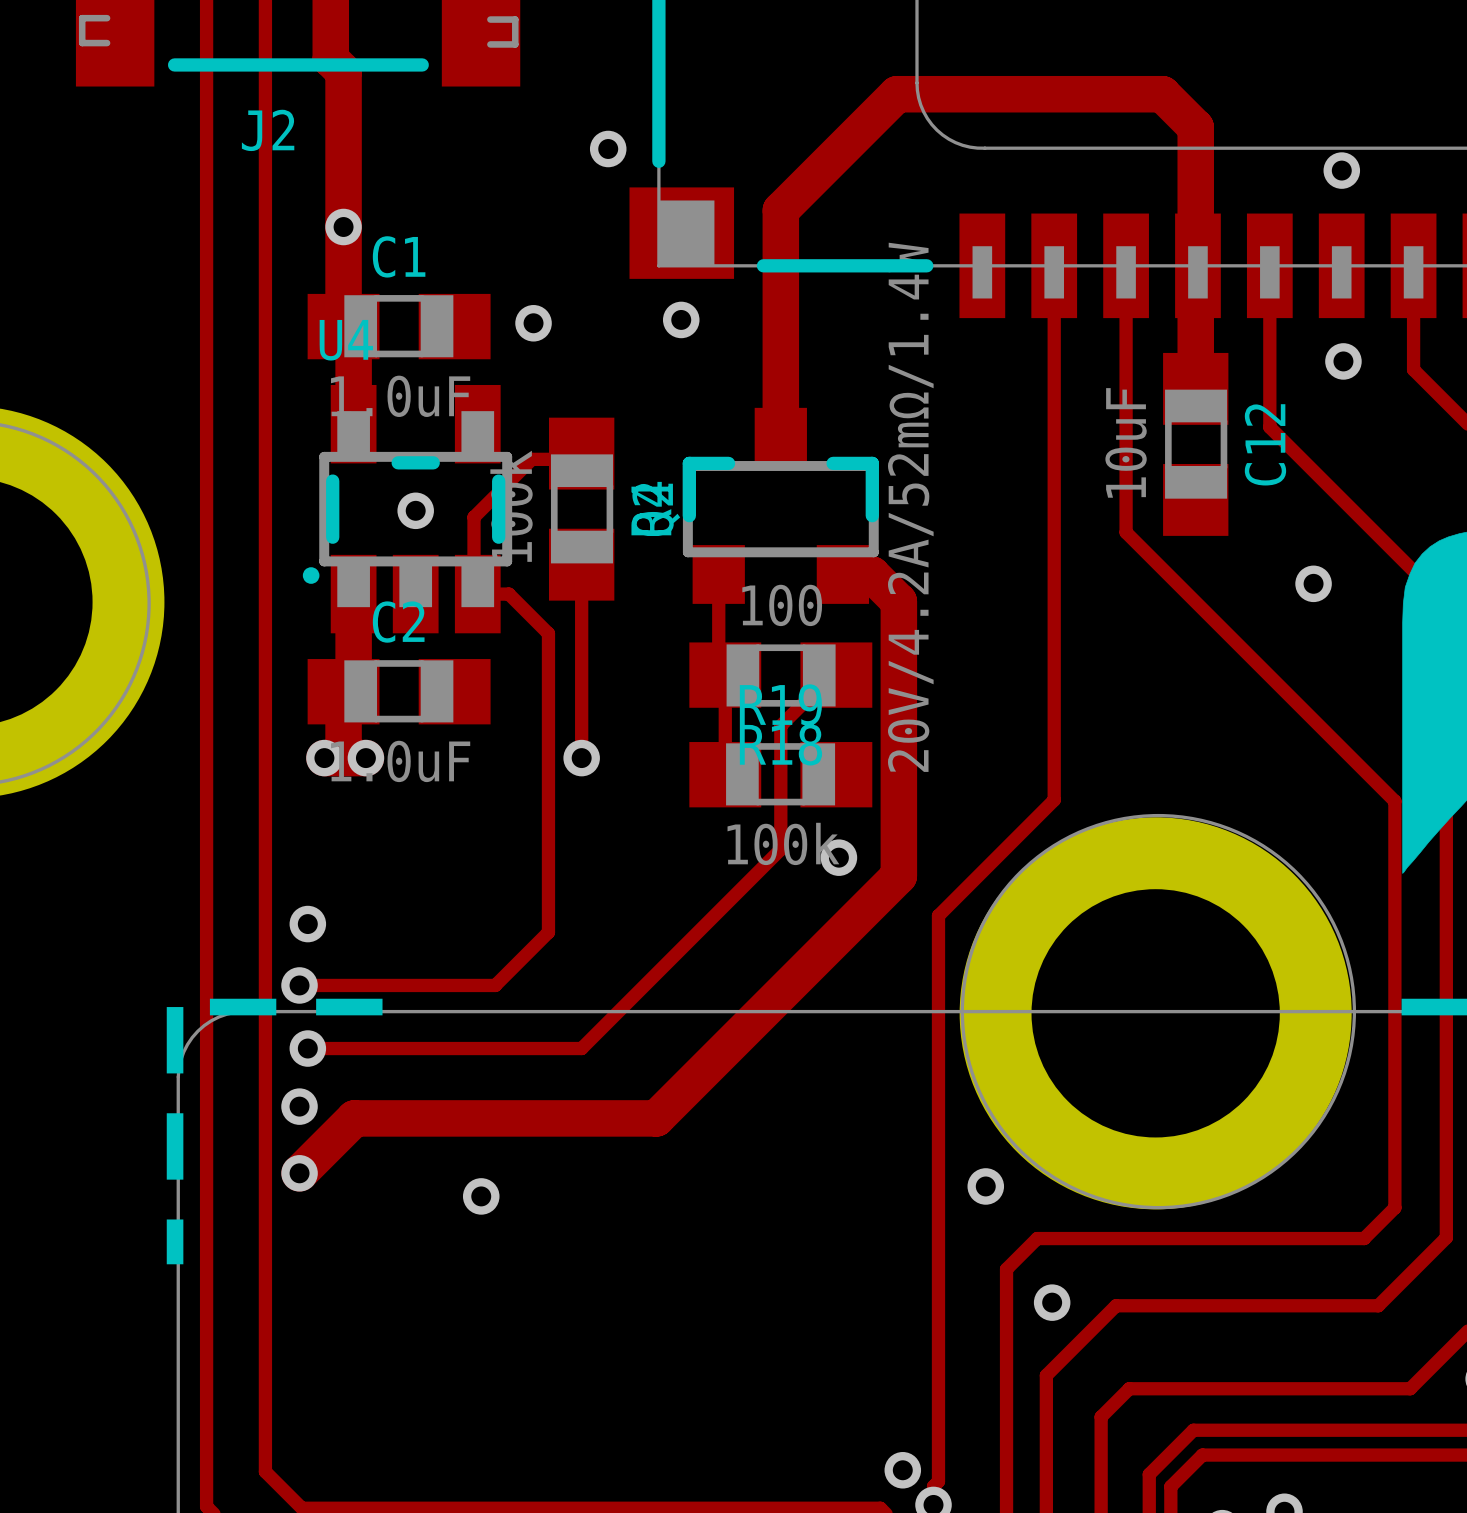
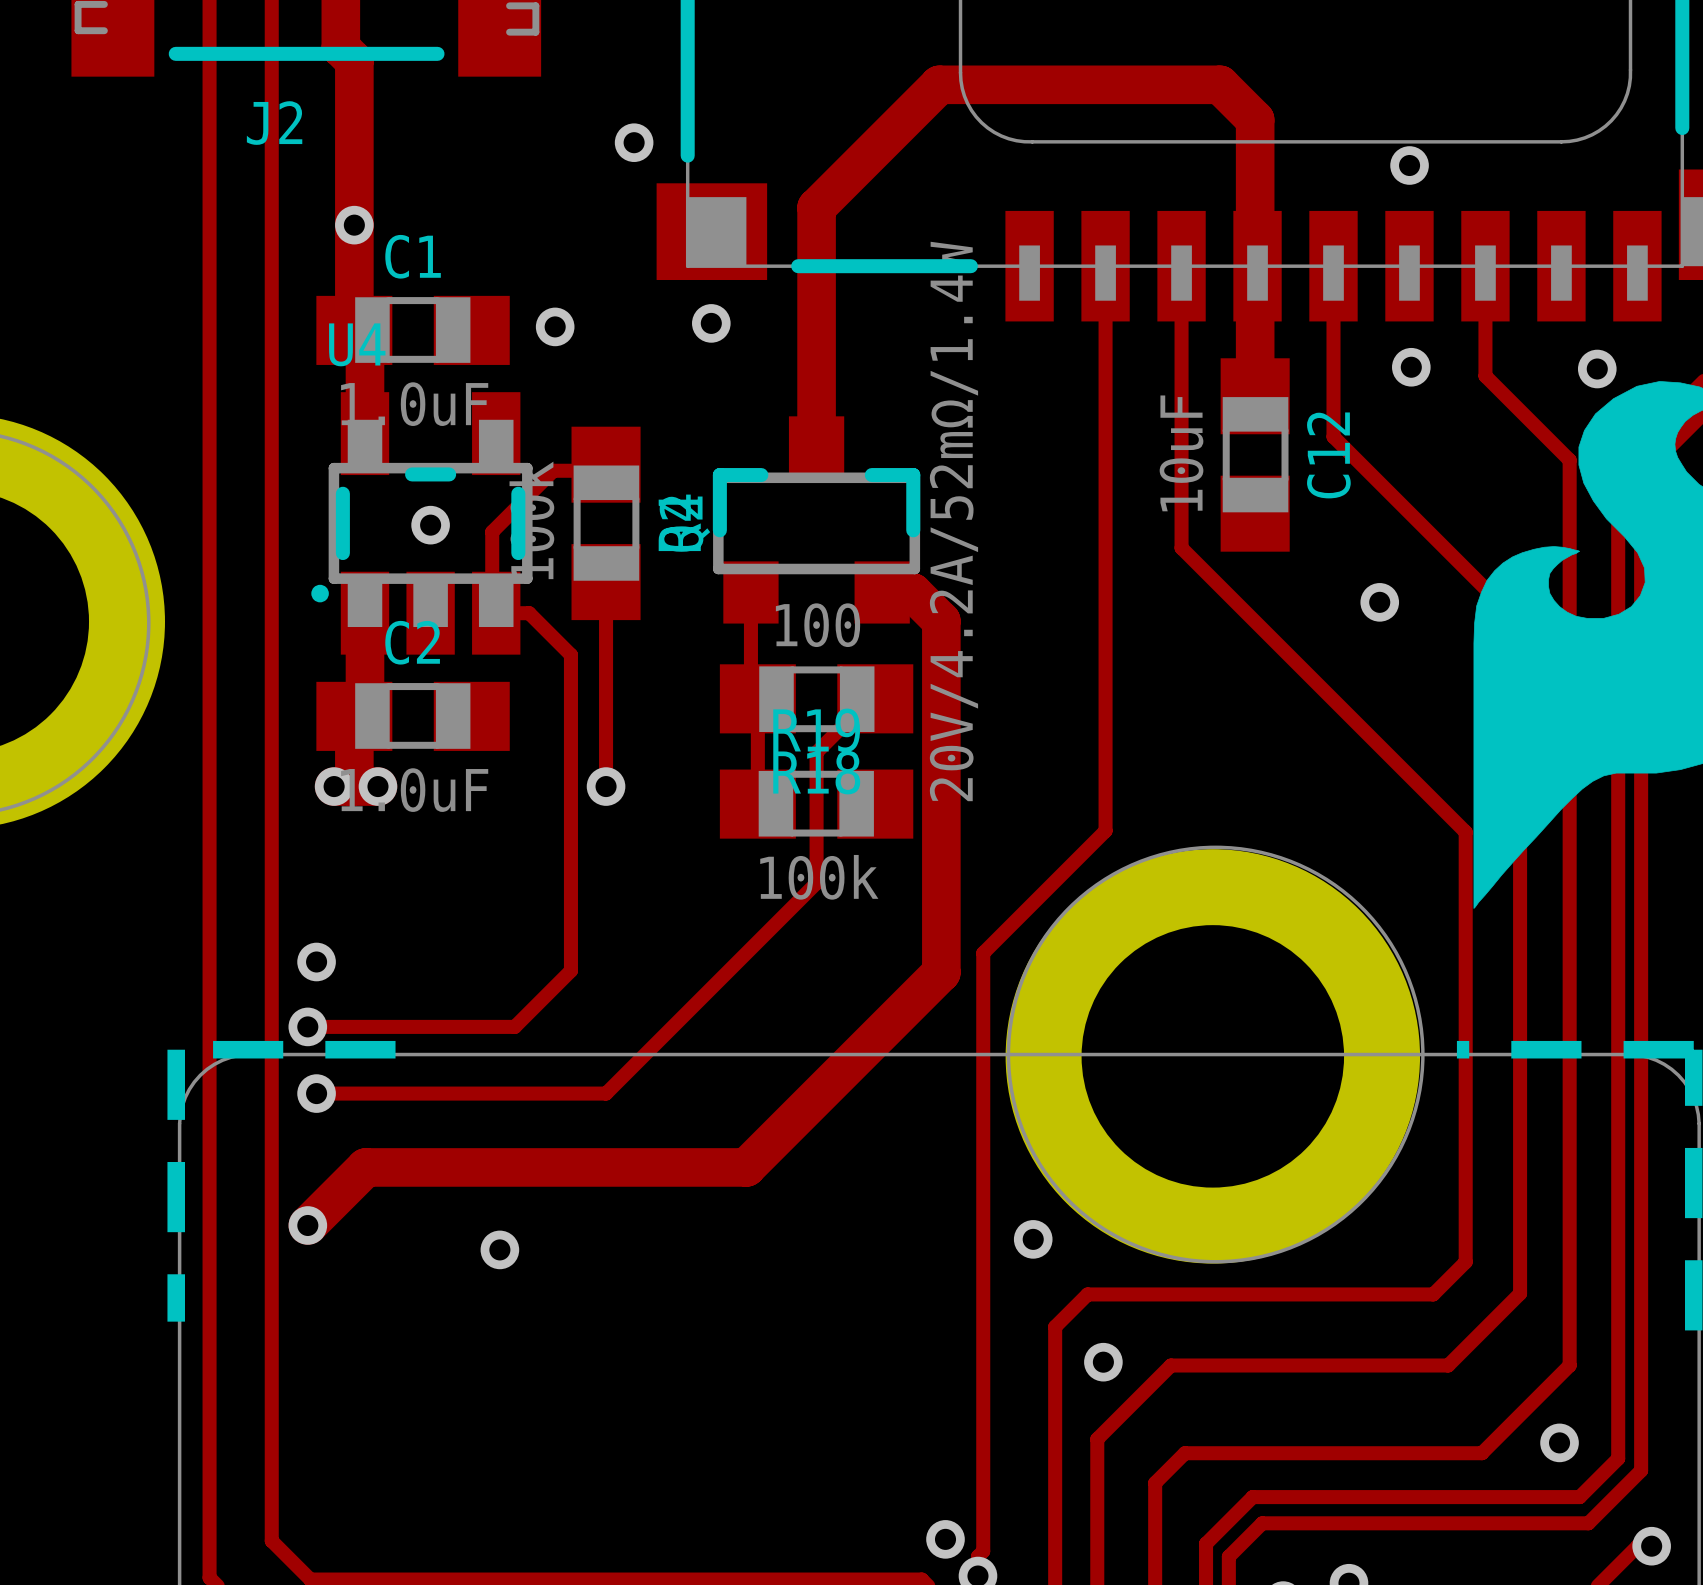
via: (838, 857) -> none
track: (898, 875) (656, 1118) -> (941, 911) (941, 972) (746, 1167) (684, 1167)
via: (299, 1106) -> none

